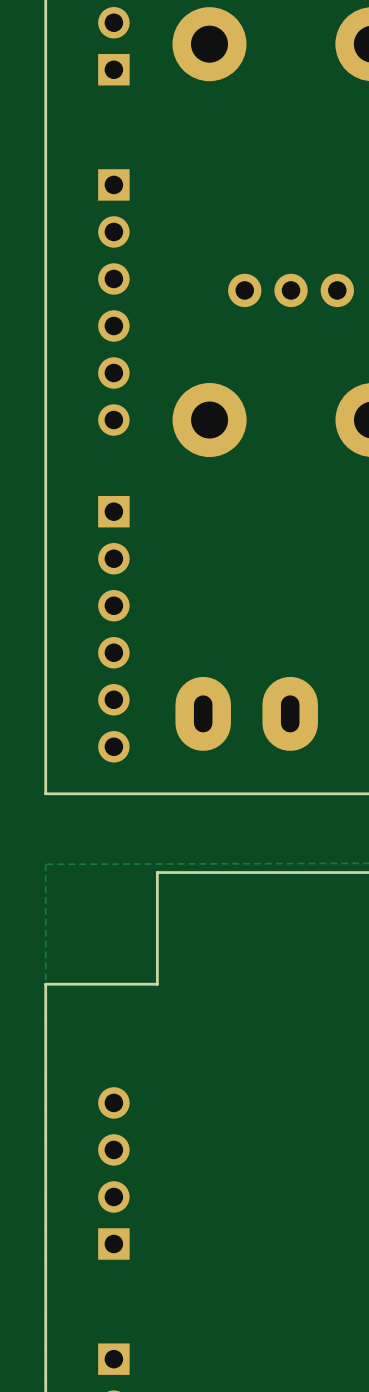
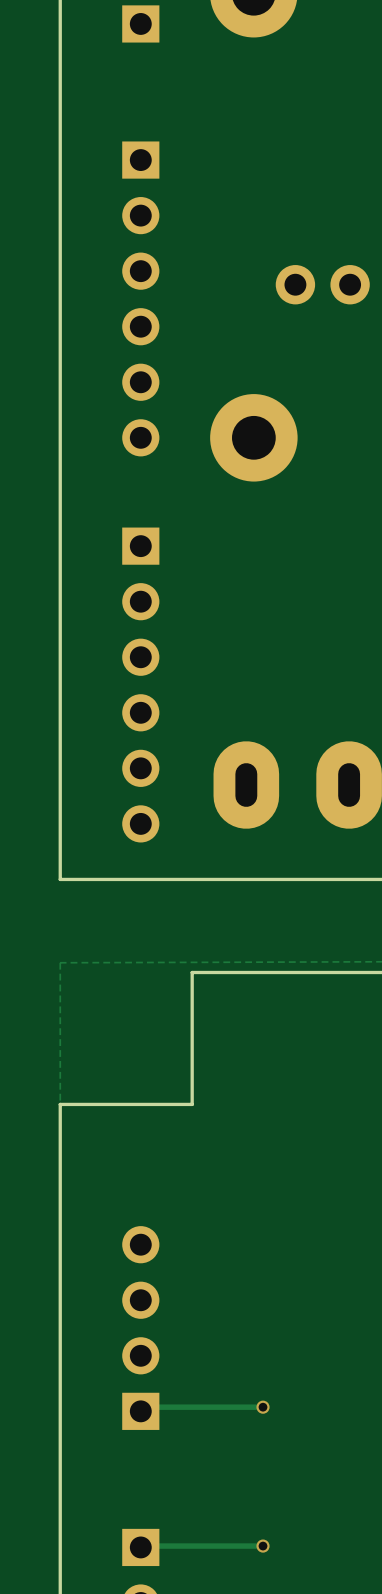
track: none -> (263, 1407) (143, 1407) (140, 1409)
via: none -> (263, 1407)
track: none -> (263, 1546) (142, 1546)
via: none -> (263, 1546)

